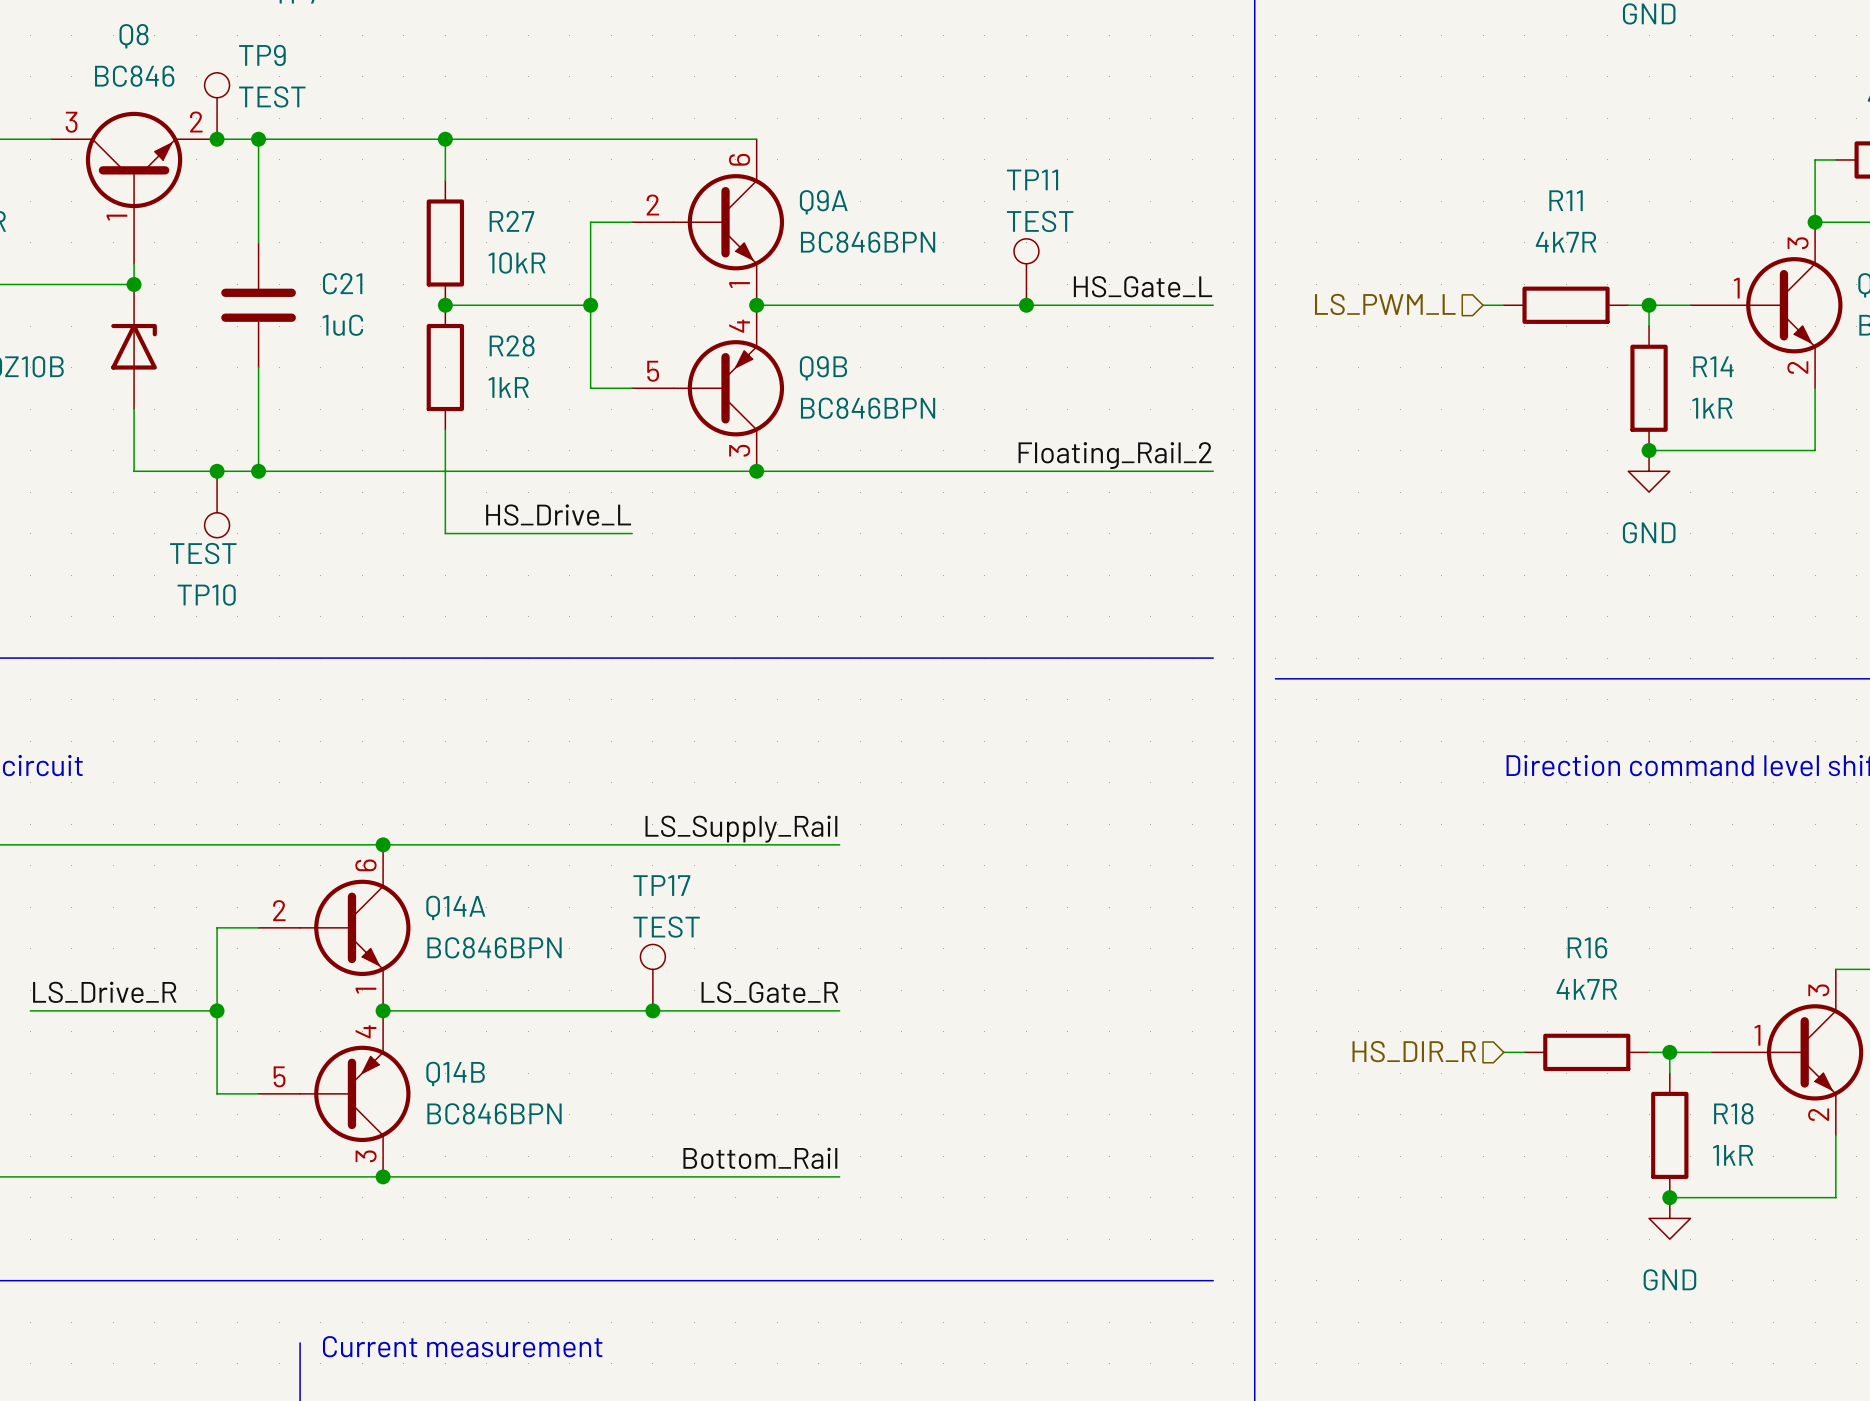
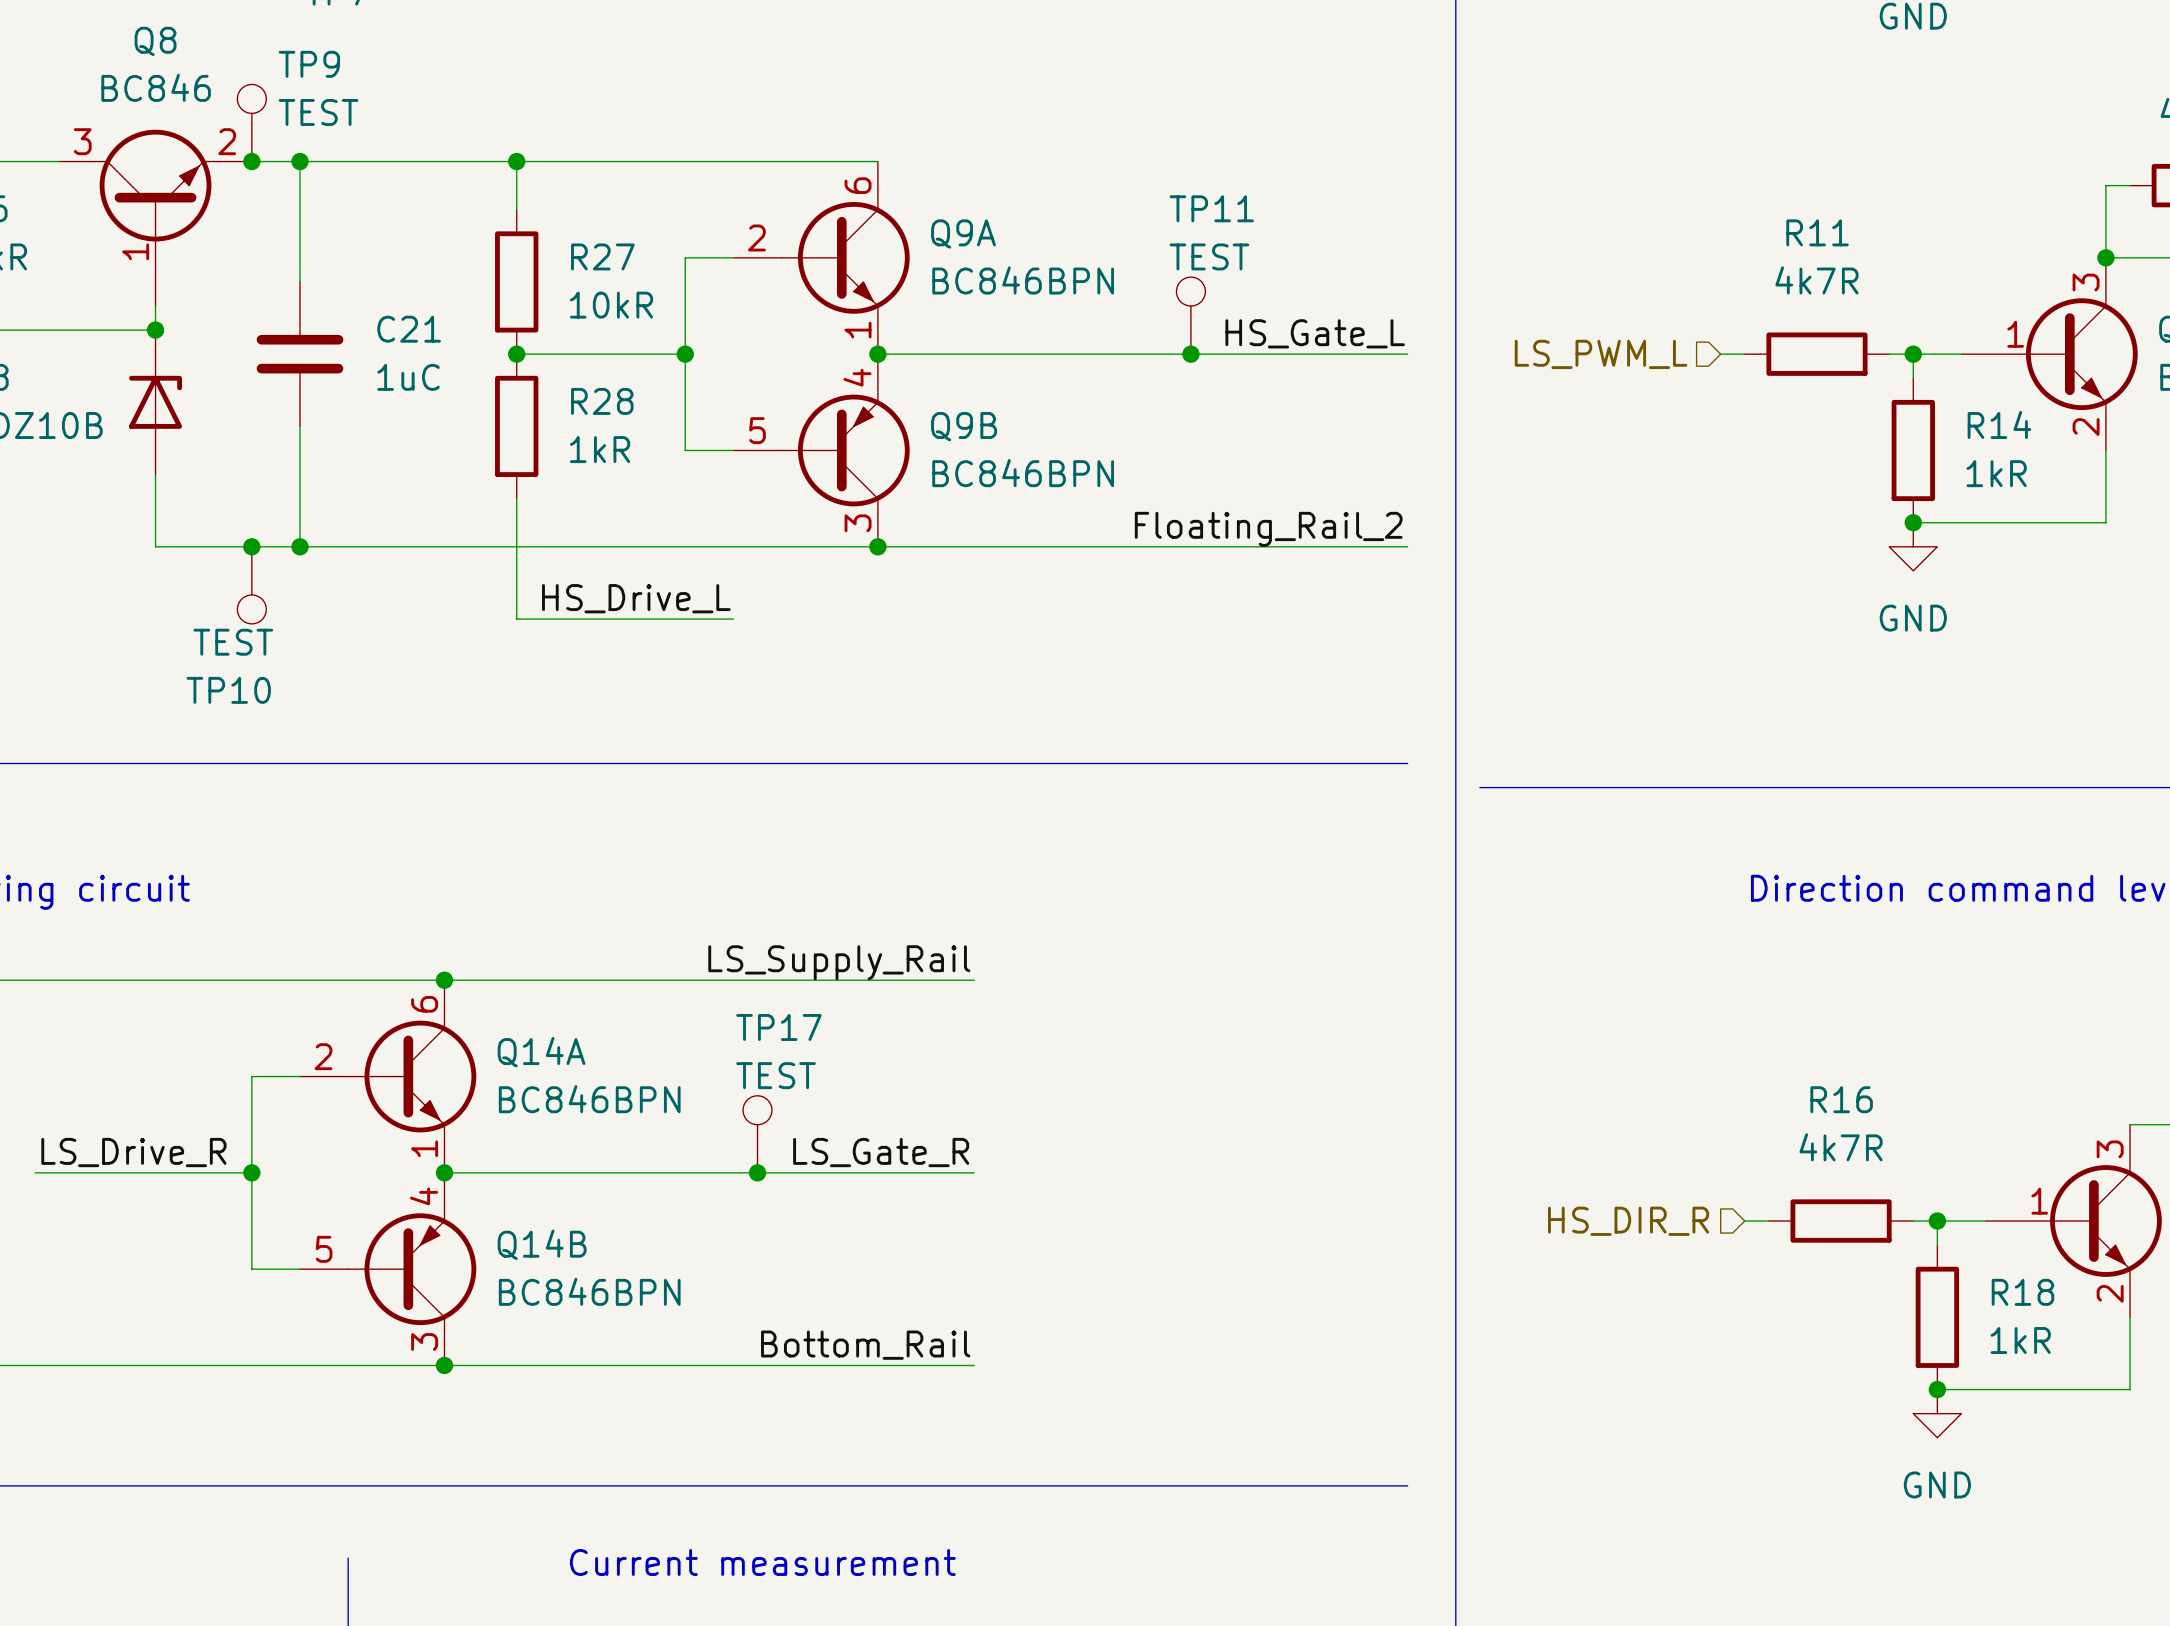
text position: Current measurement (462, 1346) -> Current measurement (762, 1562)

